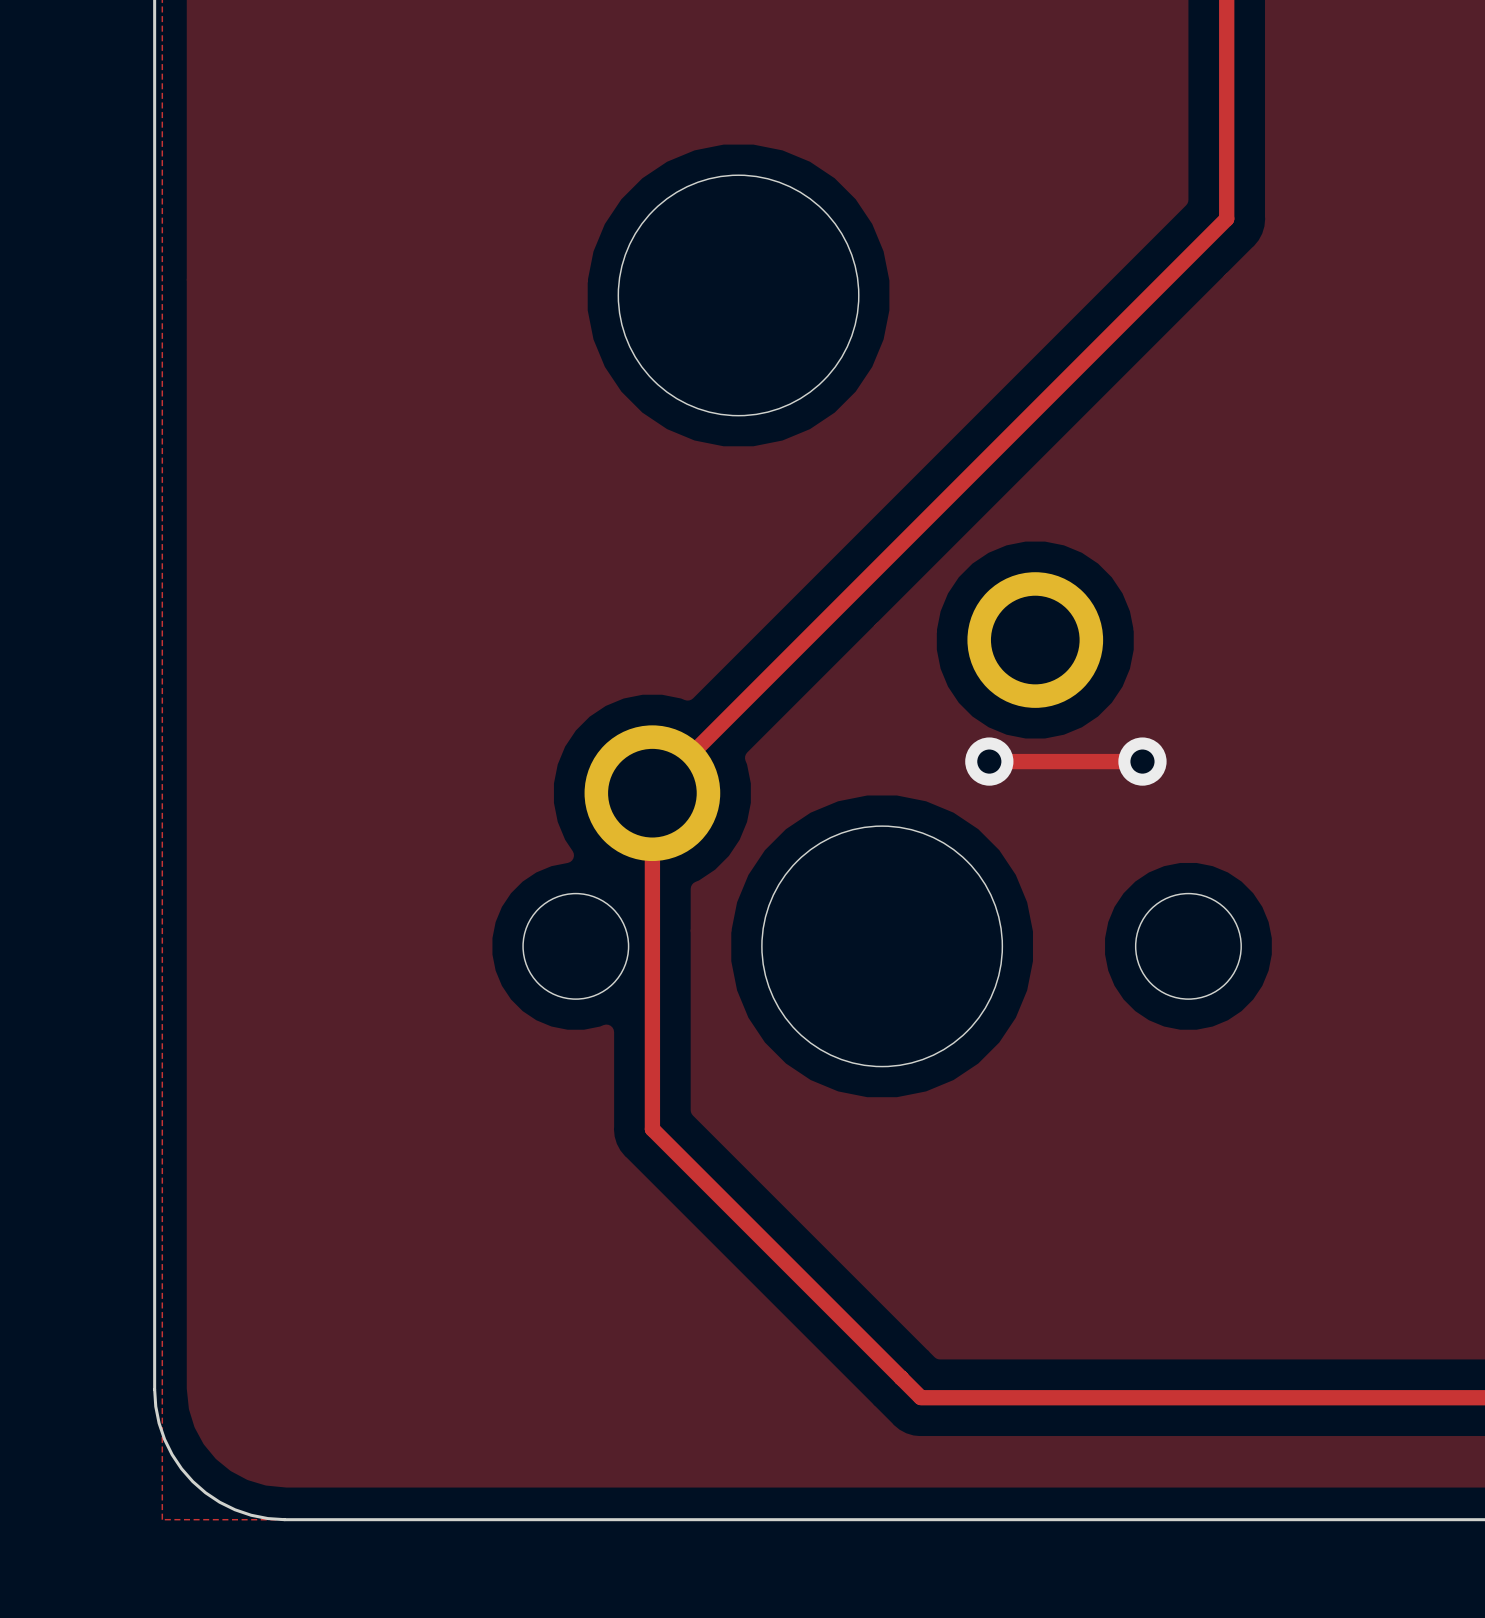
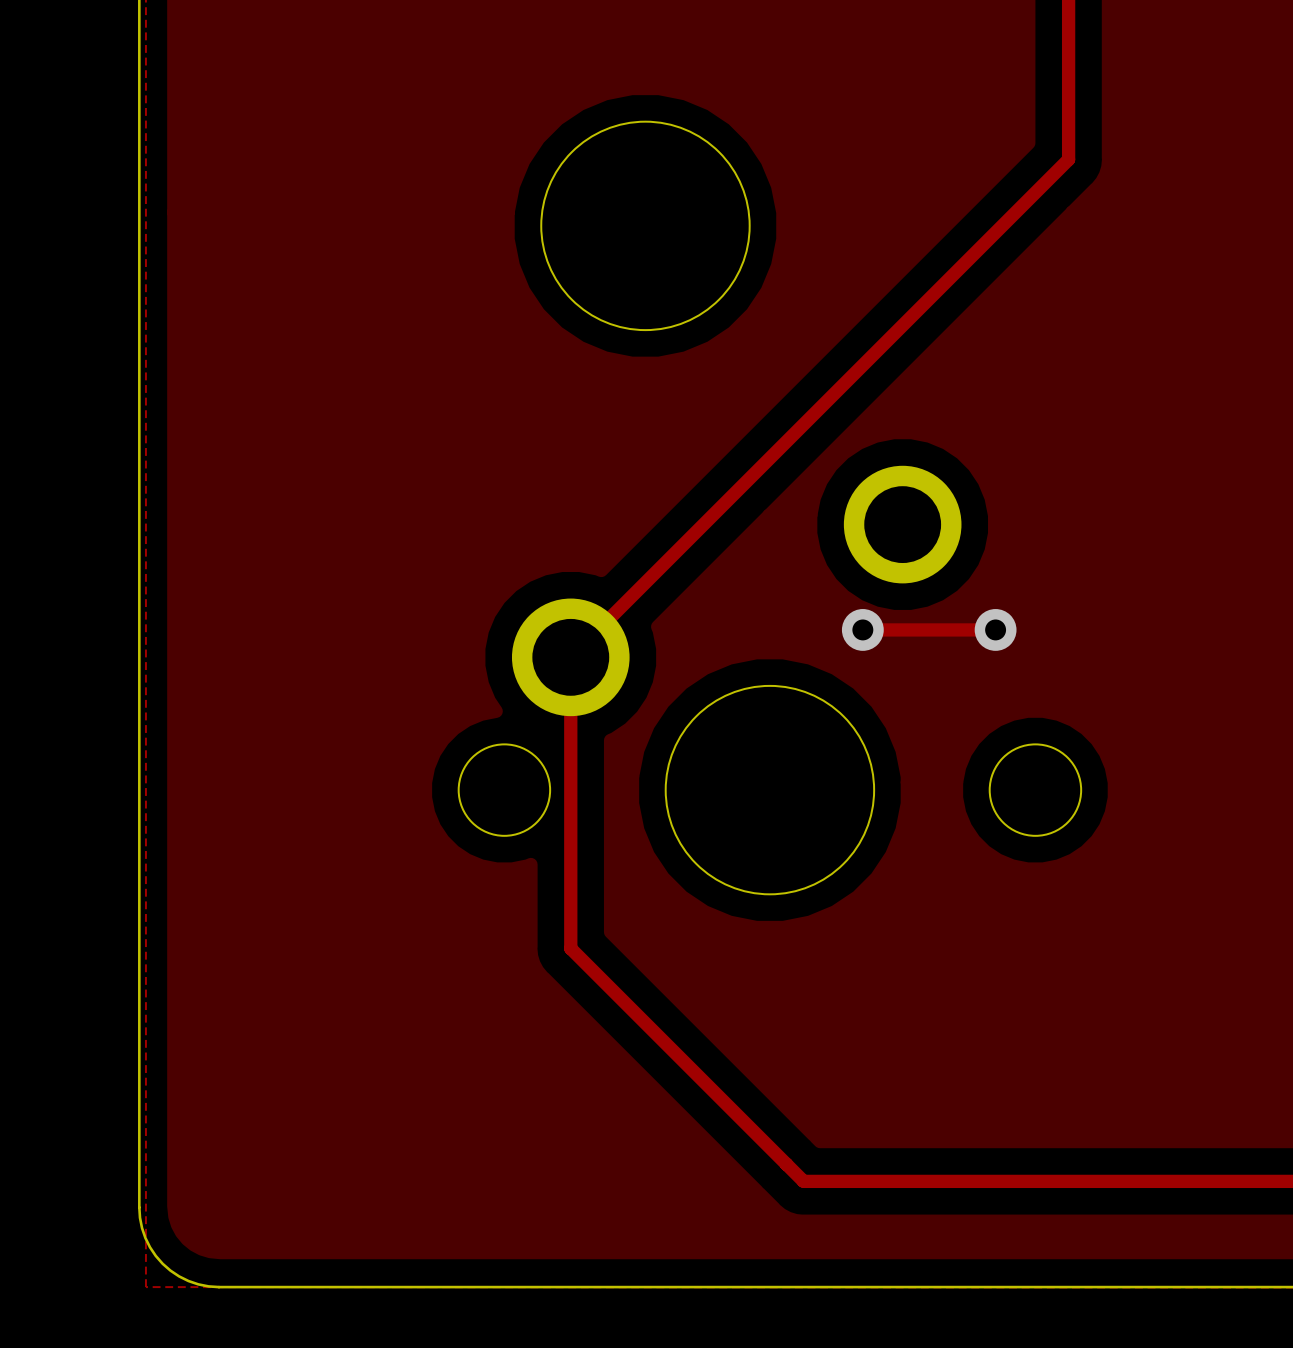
board edge: (154, 1389) (155, 1406) (164, 1439) (181, 1468) (192, 1481) (205, 1492) (235, 1509) (267, 1518) (284, 1519) -> (139, 1174) (139, 1207) (142, 1228) (149, 1247) (162, 1263) (179, 1276) (198, 1284) (218, 1287) (252, 1287)

